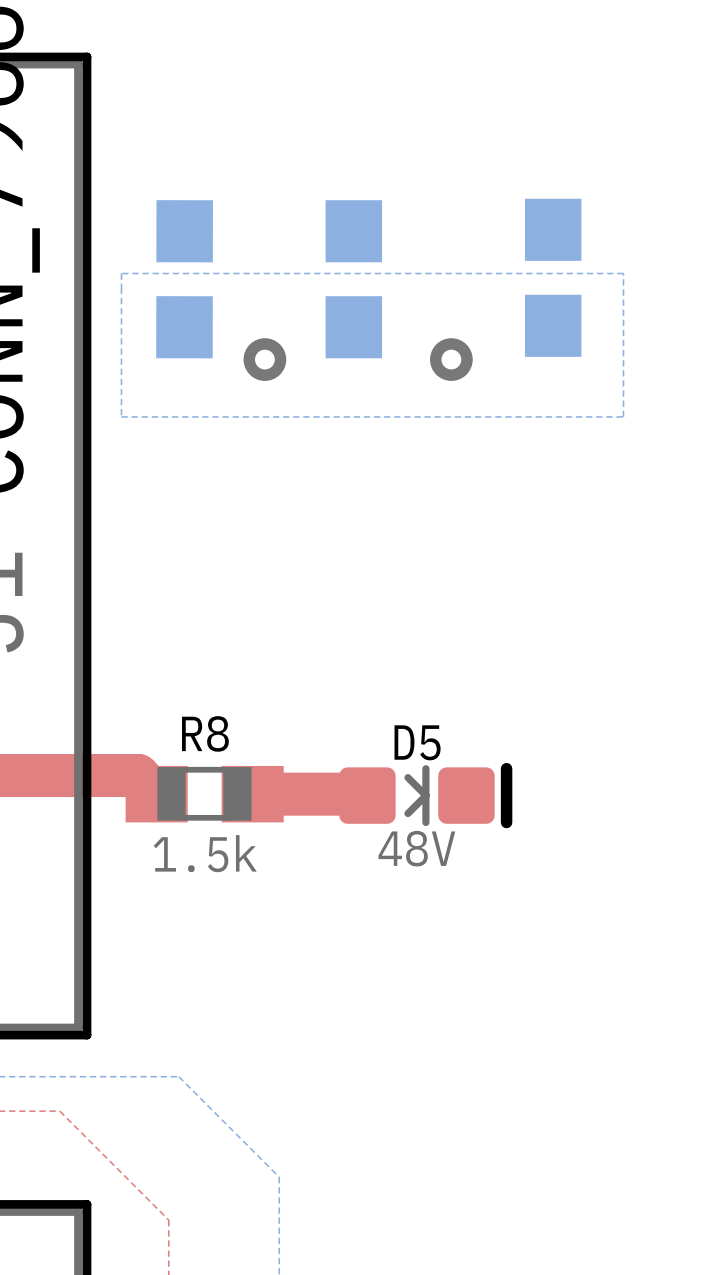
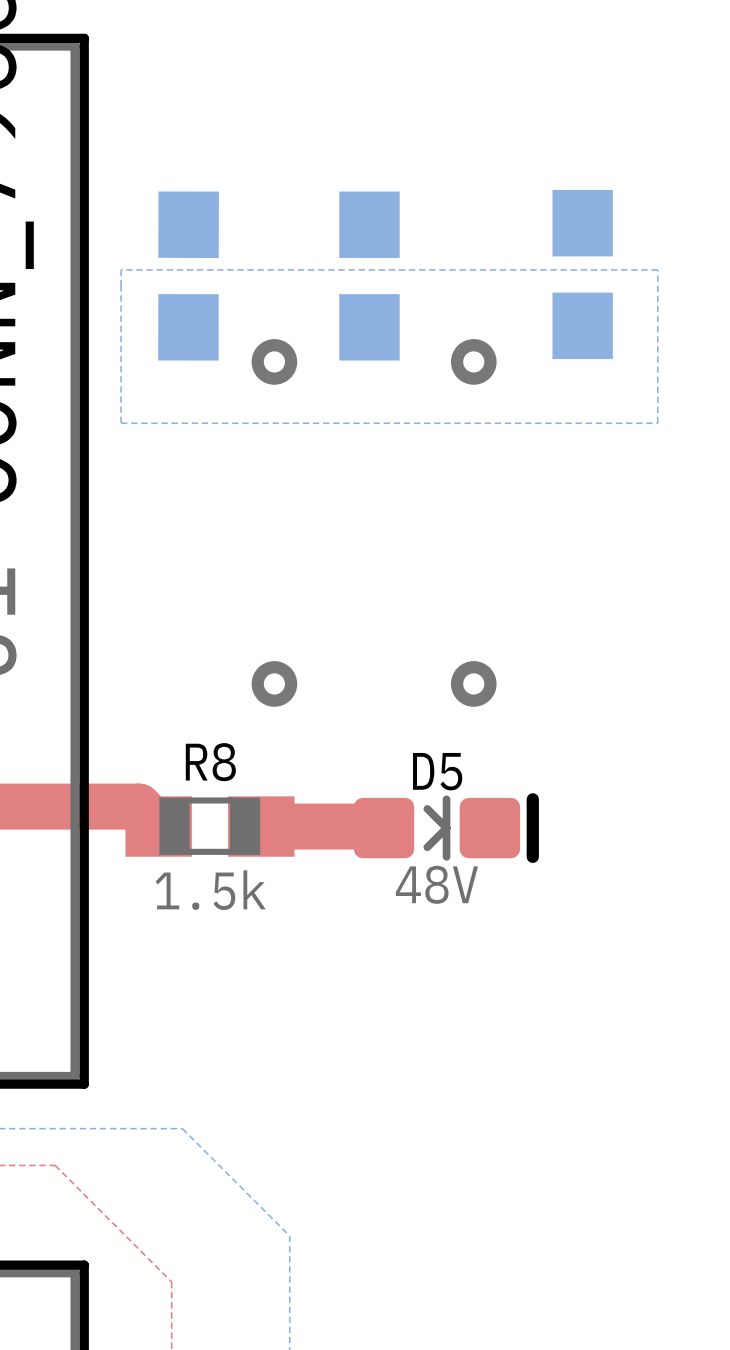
via: none -> (274, 683)
via: none -> (473, 683)

